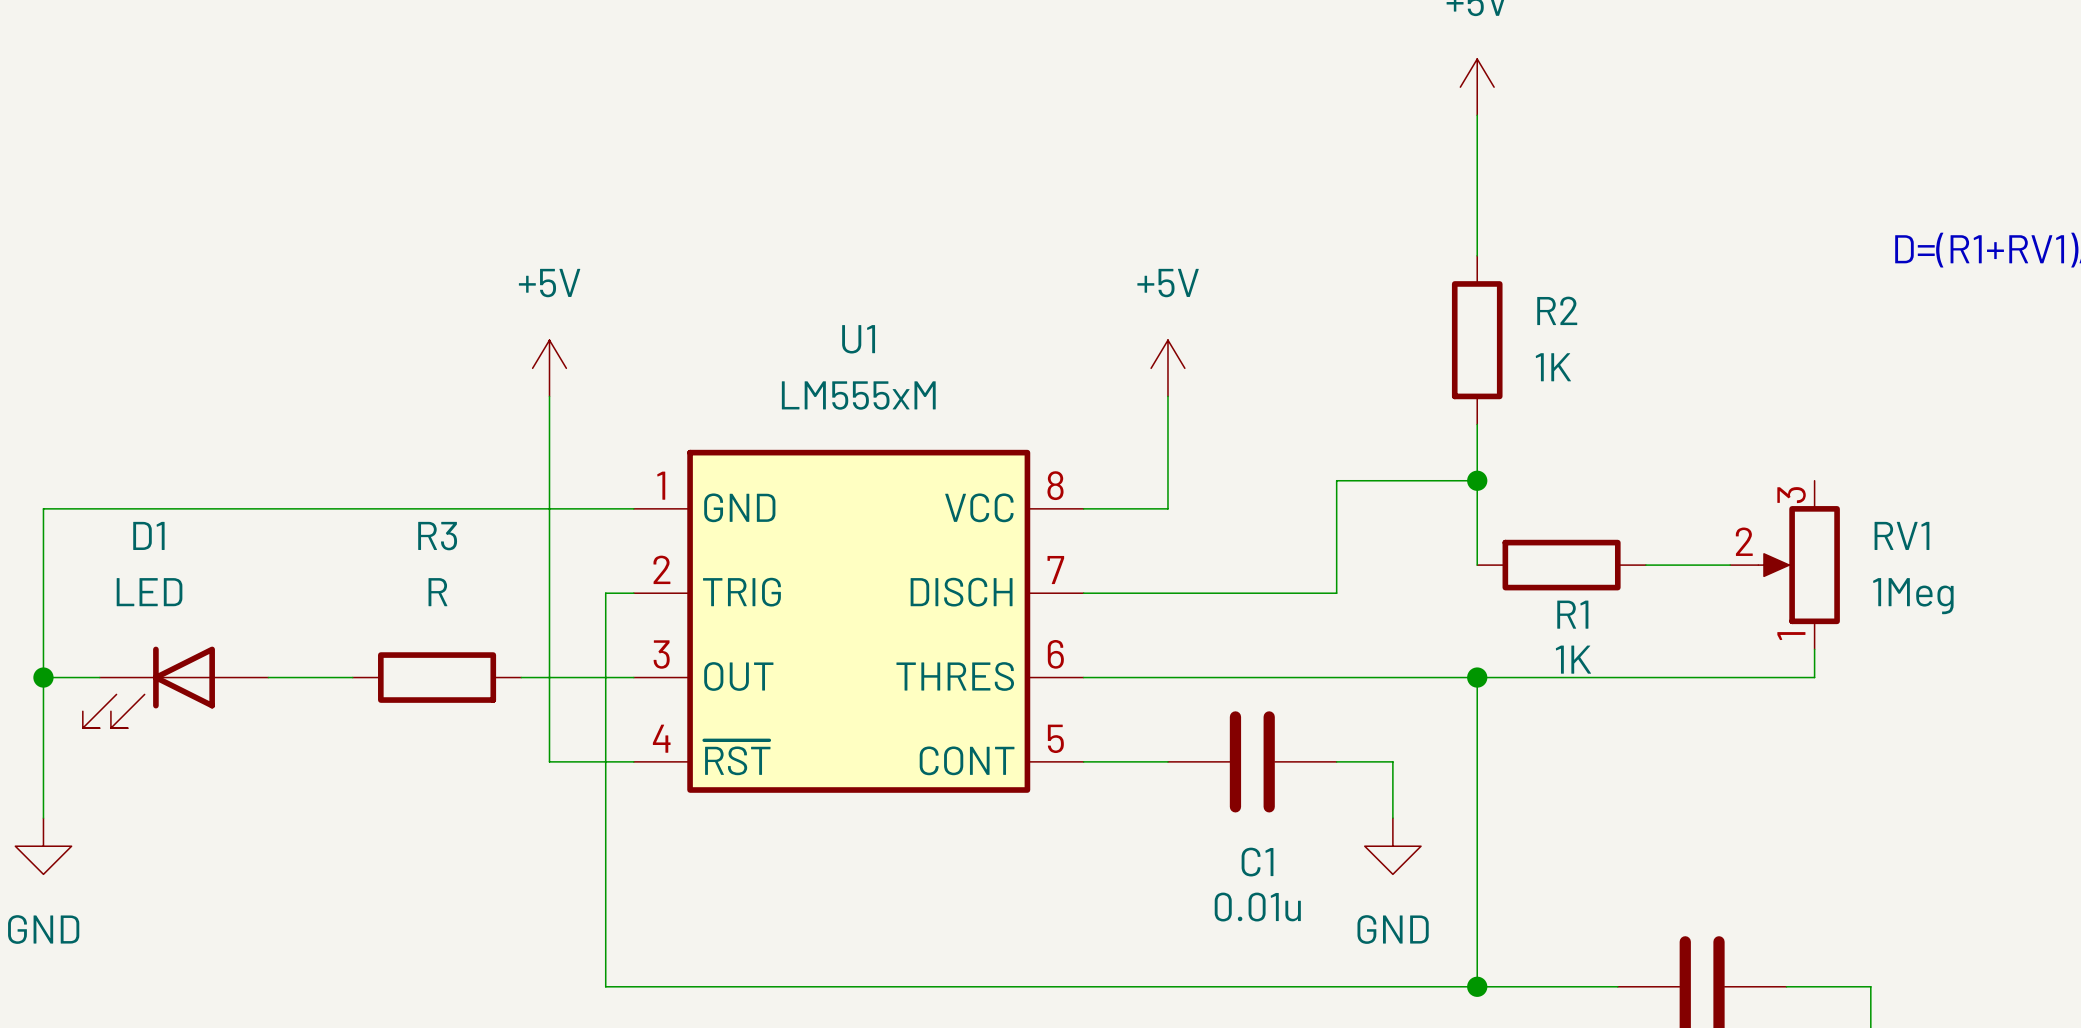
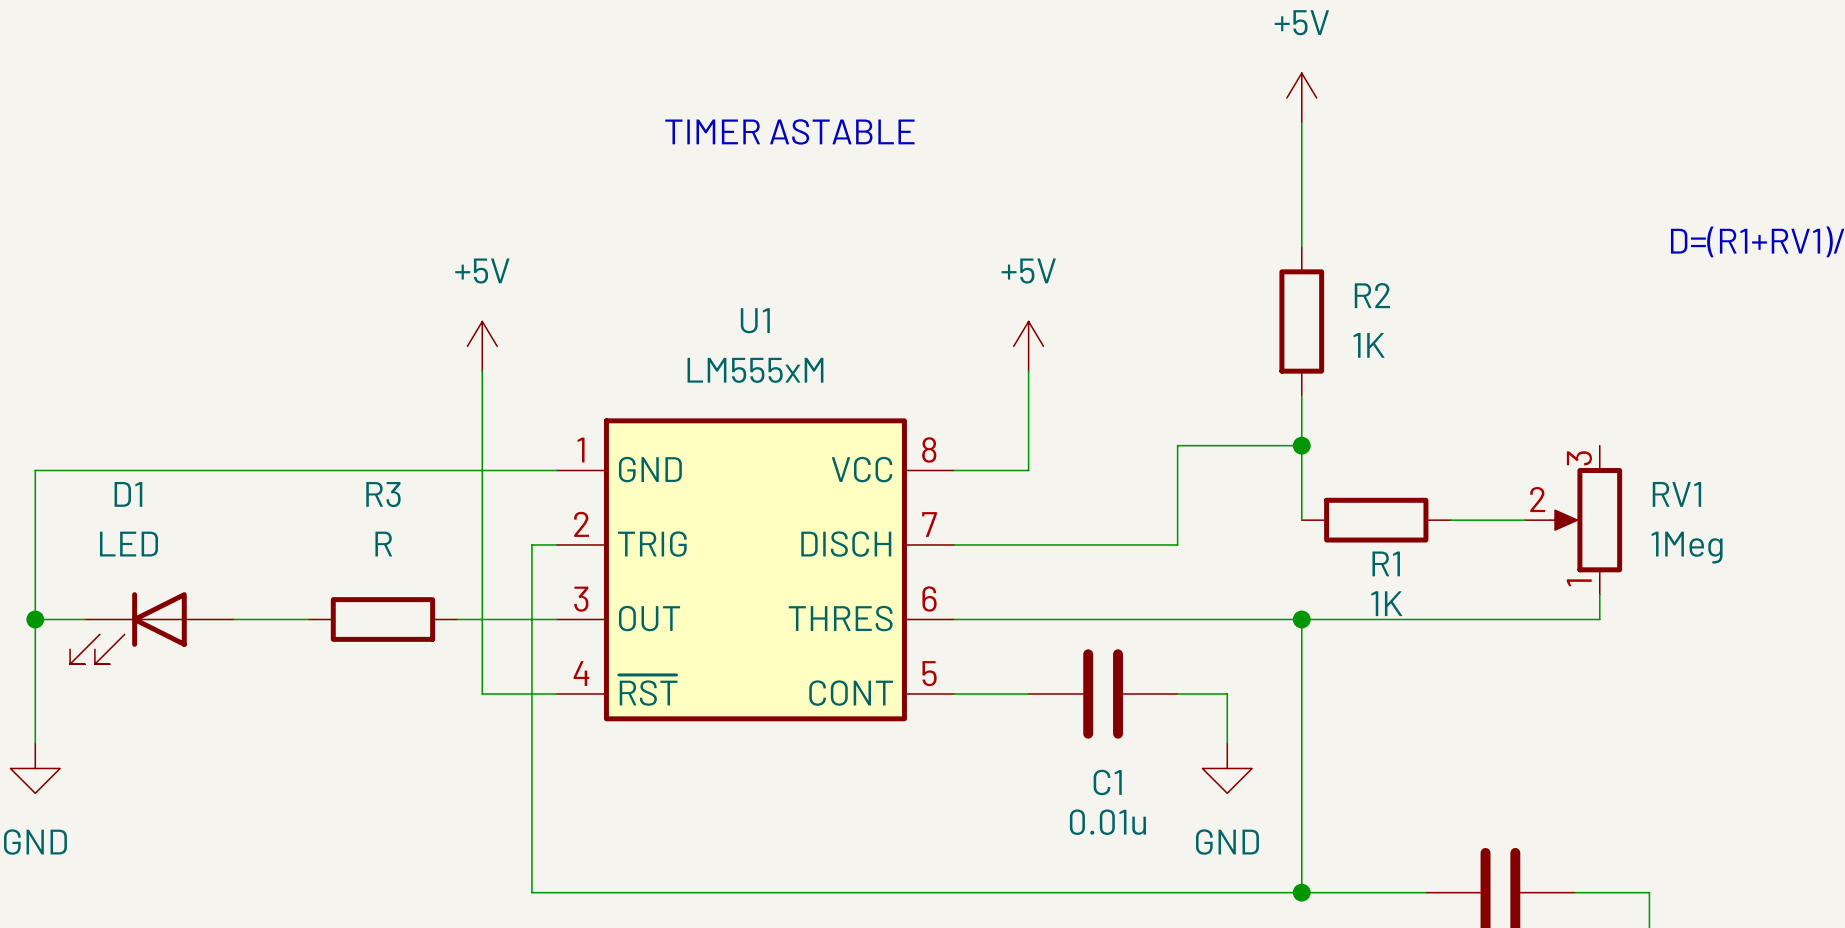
text: none -> TIMER ASTABLE (789, 131)

